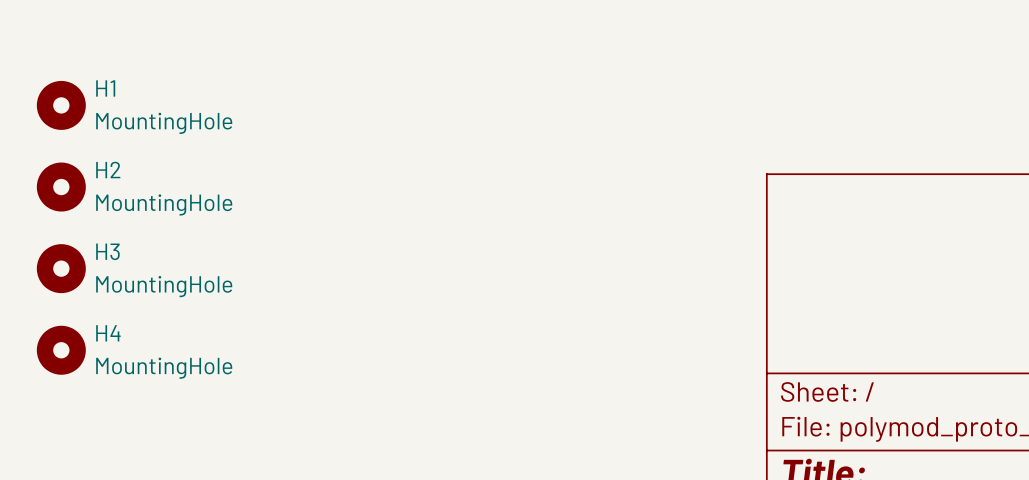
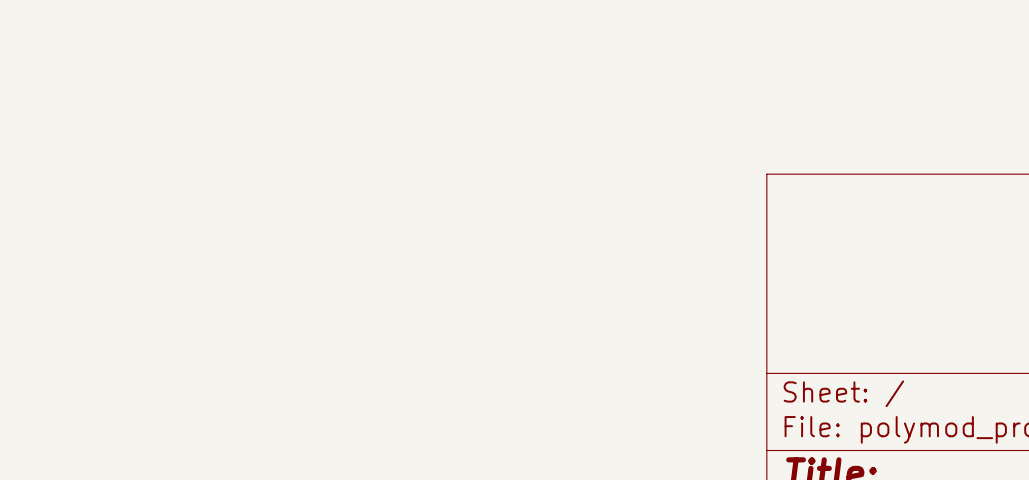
H1: MountingHole (61, 105) -> none
H2: MountingHole (61, 187) -> none
H3: MountingHole (61, 268) -> none
H4: MountingHole (61, 350) -> none

